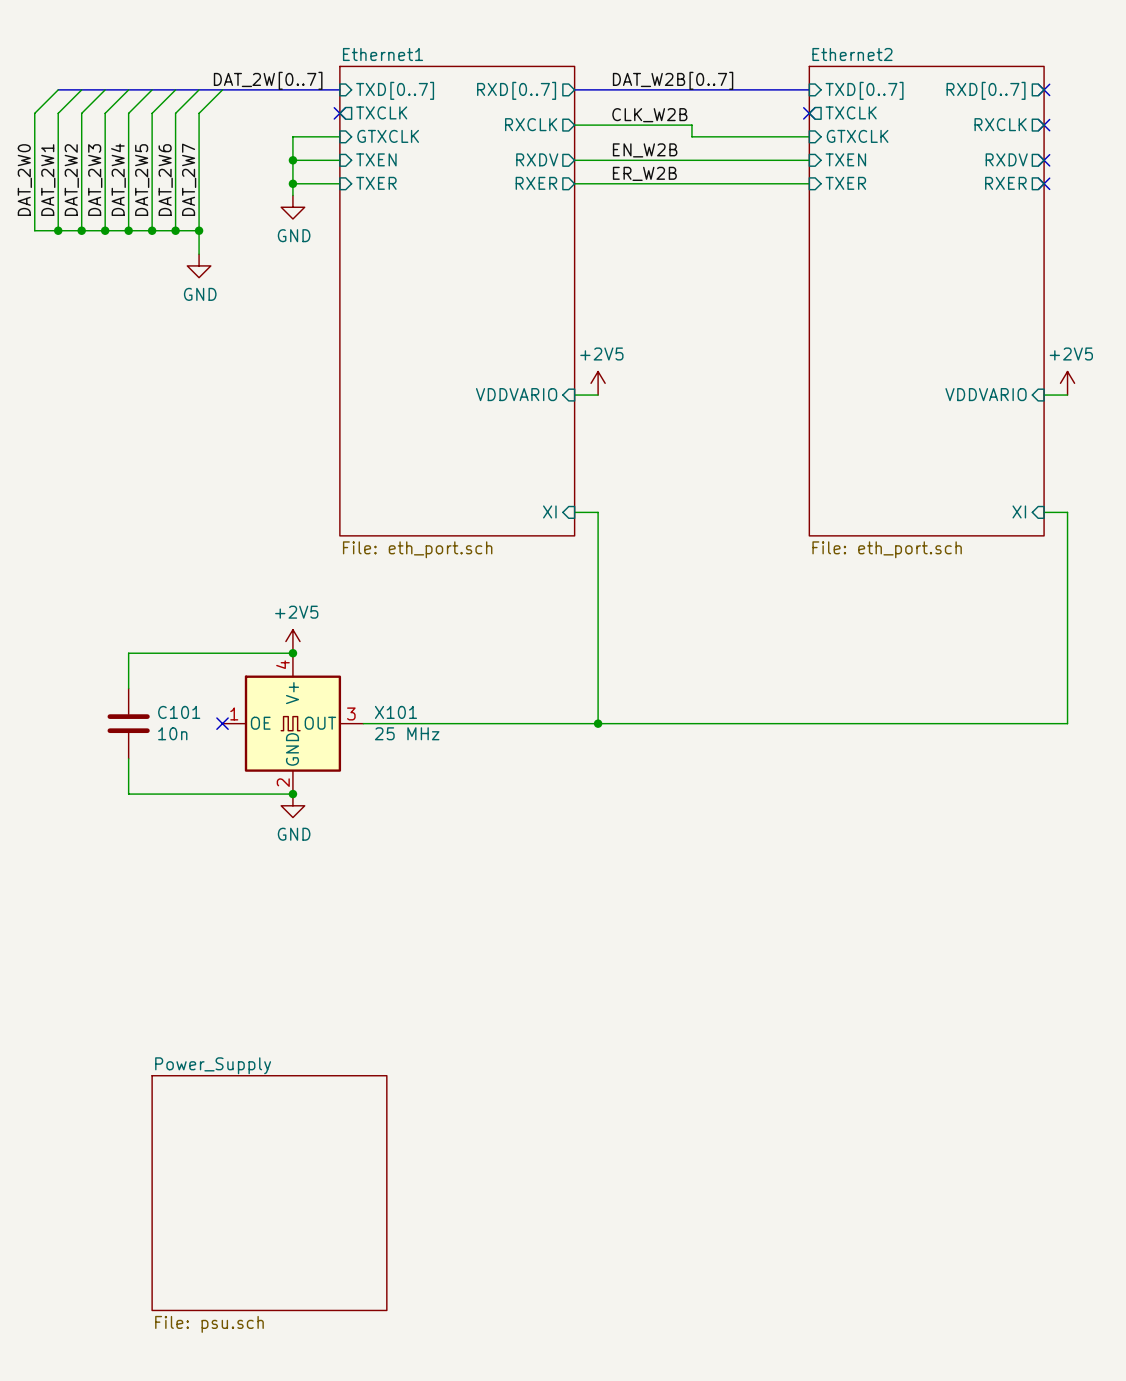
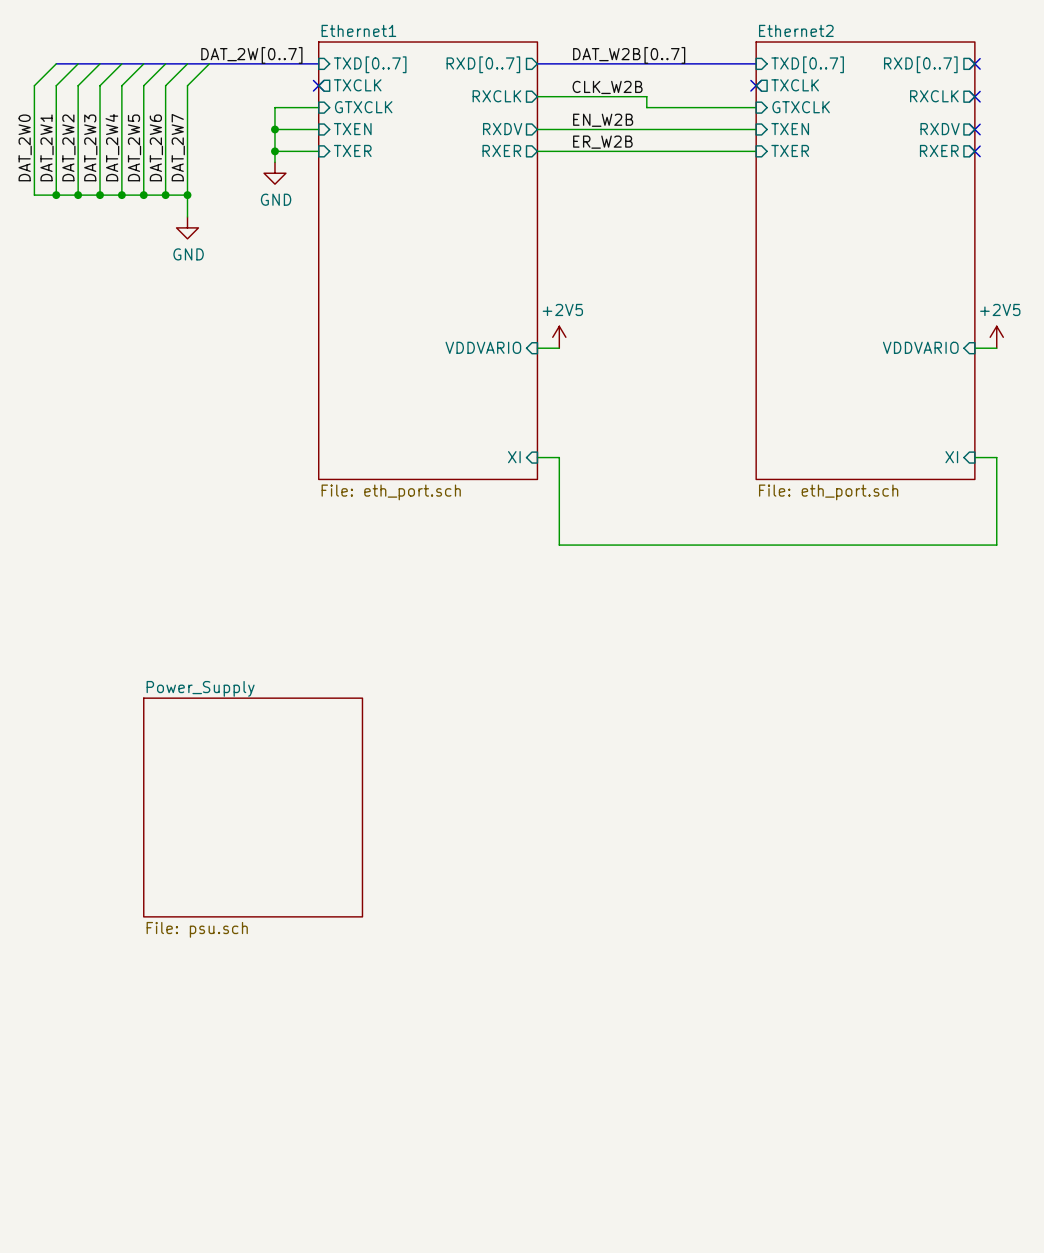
wire: (598, 606) (598, 723) -> none
wire: (1067, 606) (1067, 723) (363, 723) -> (996, 545) (559, 545)
power symbol: +2V5 (292, 641) -> none
wire: (292, 653) (128, 653) (128, 688) -> none
junction: (292, 653) -> none
C101: 10n (128, 723) -> none
no-connect mark: (222, 723) -> none
X101: 25 MHz (292, 723) -> none
junction: (598, 723) -> none
wire: (128, 758) (128, 794) (292, 794) -> none
junction: (292, 794) -> none
power symbol: GND (292, 805) -> none
sheet Power_Supply: none -> File: psu.sch (253, 807)
sheet Power_Supply: File: psu.sch (269, 1193) -> none

